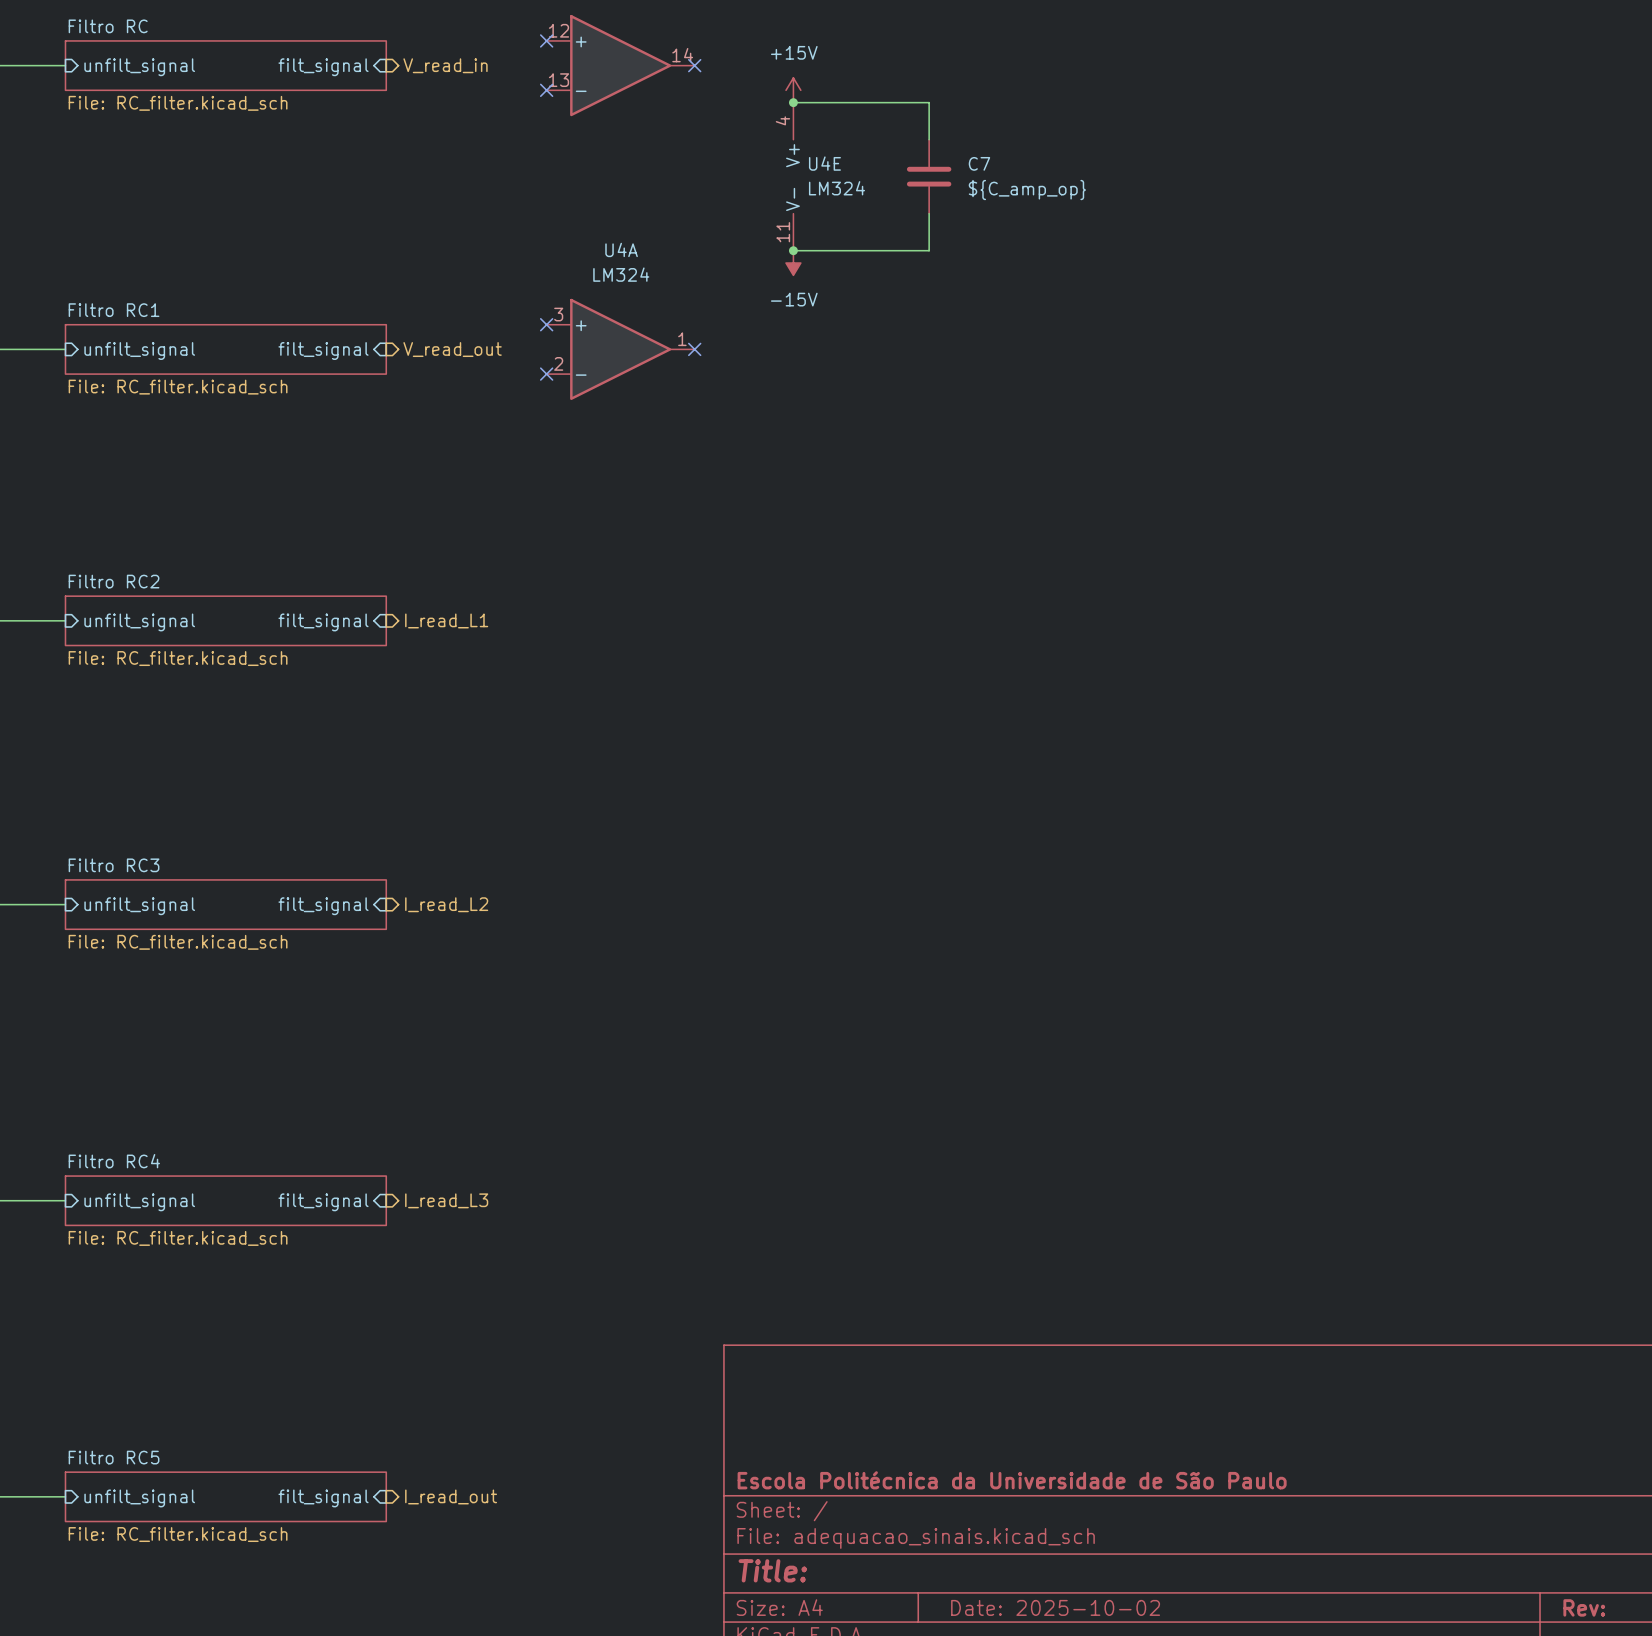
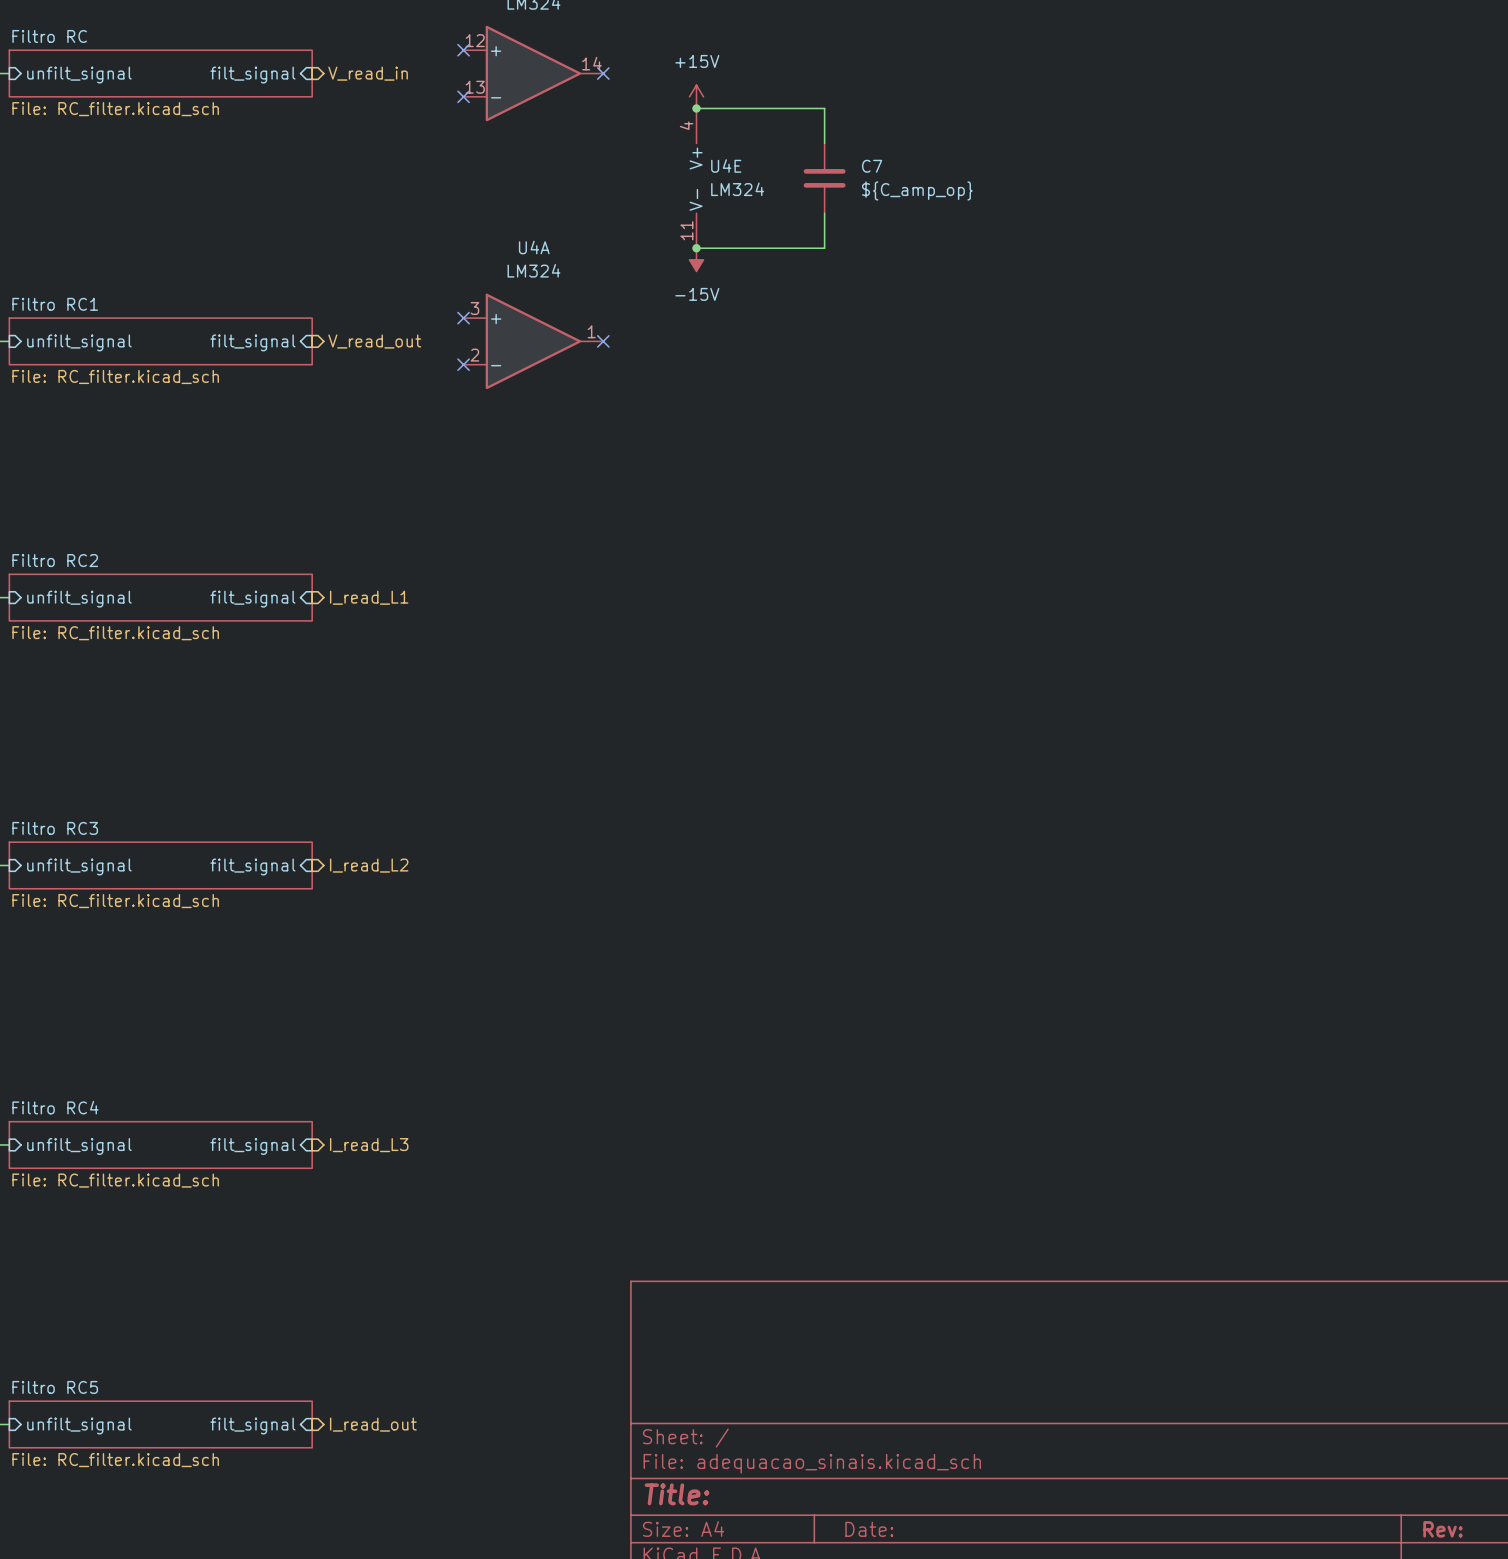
title block: Escola Politécnica da Universidade de São Paulo (1012, 1480) -> none
title block: Date: 2025-10-02 (1055, 1607) -> Date: (869, 1529)

